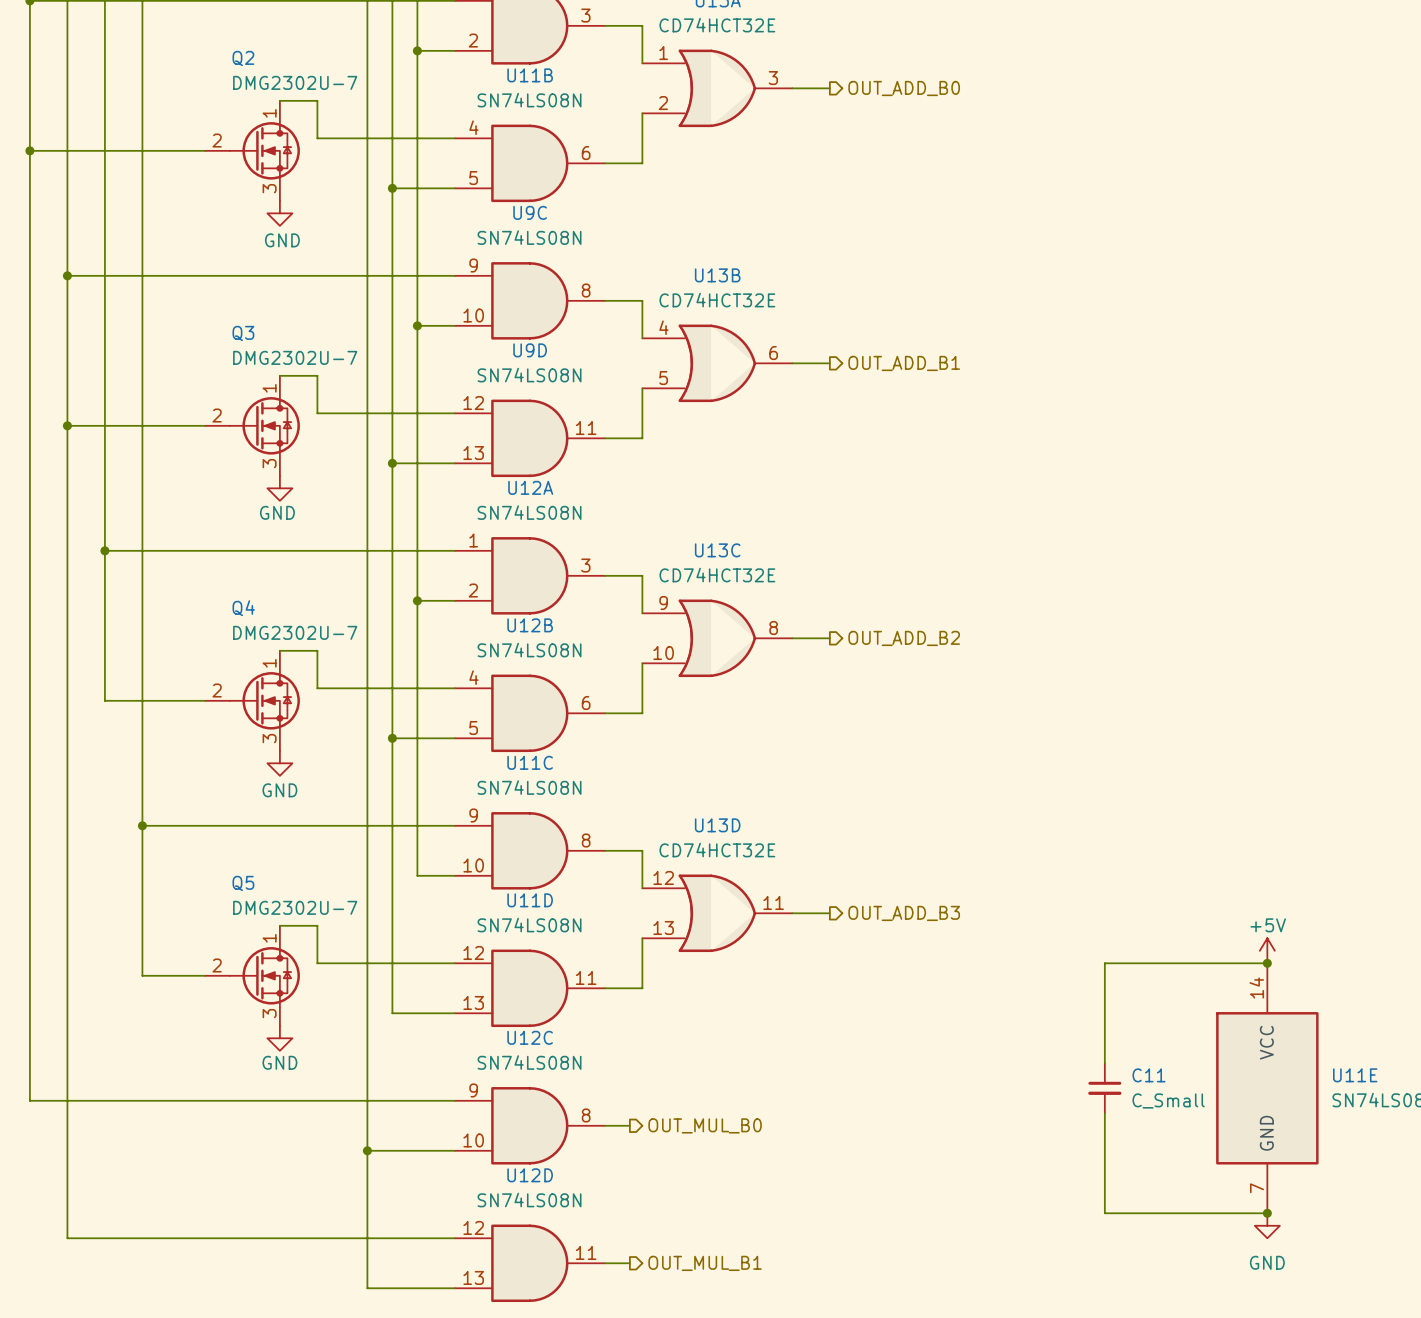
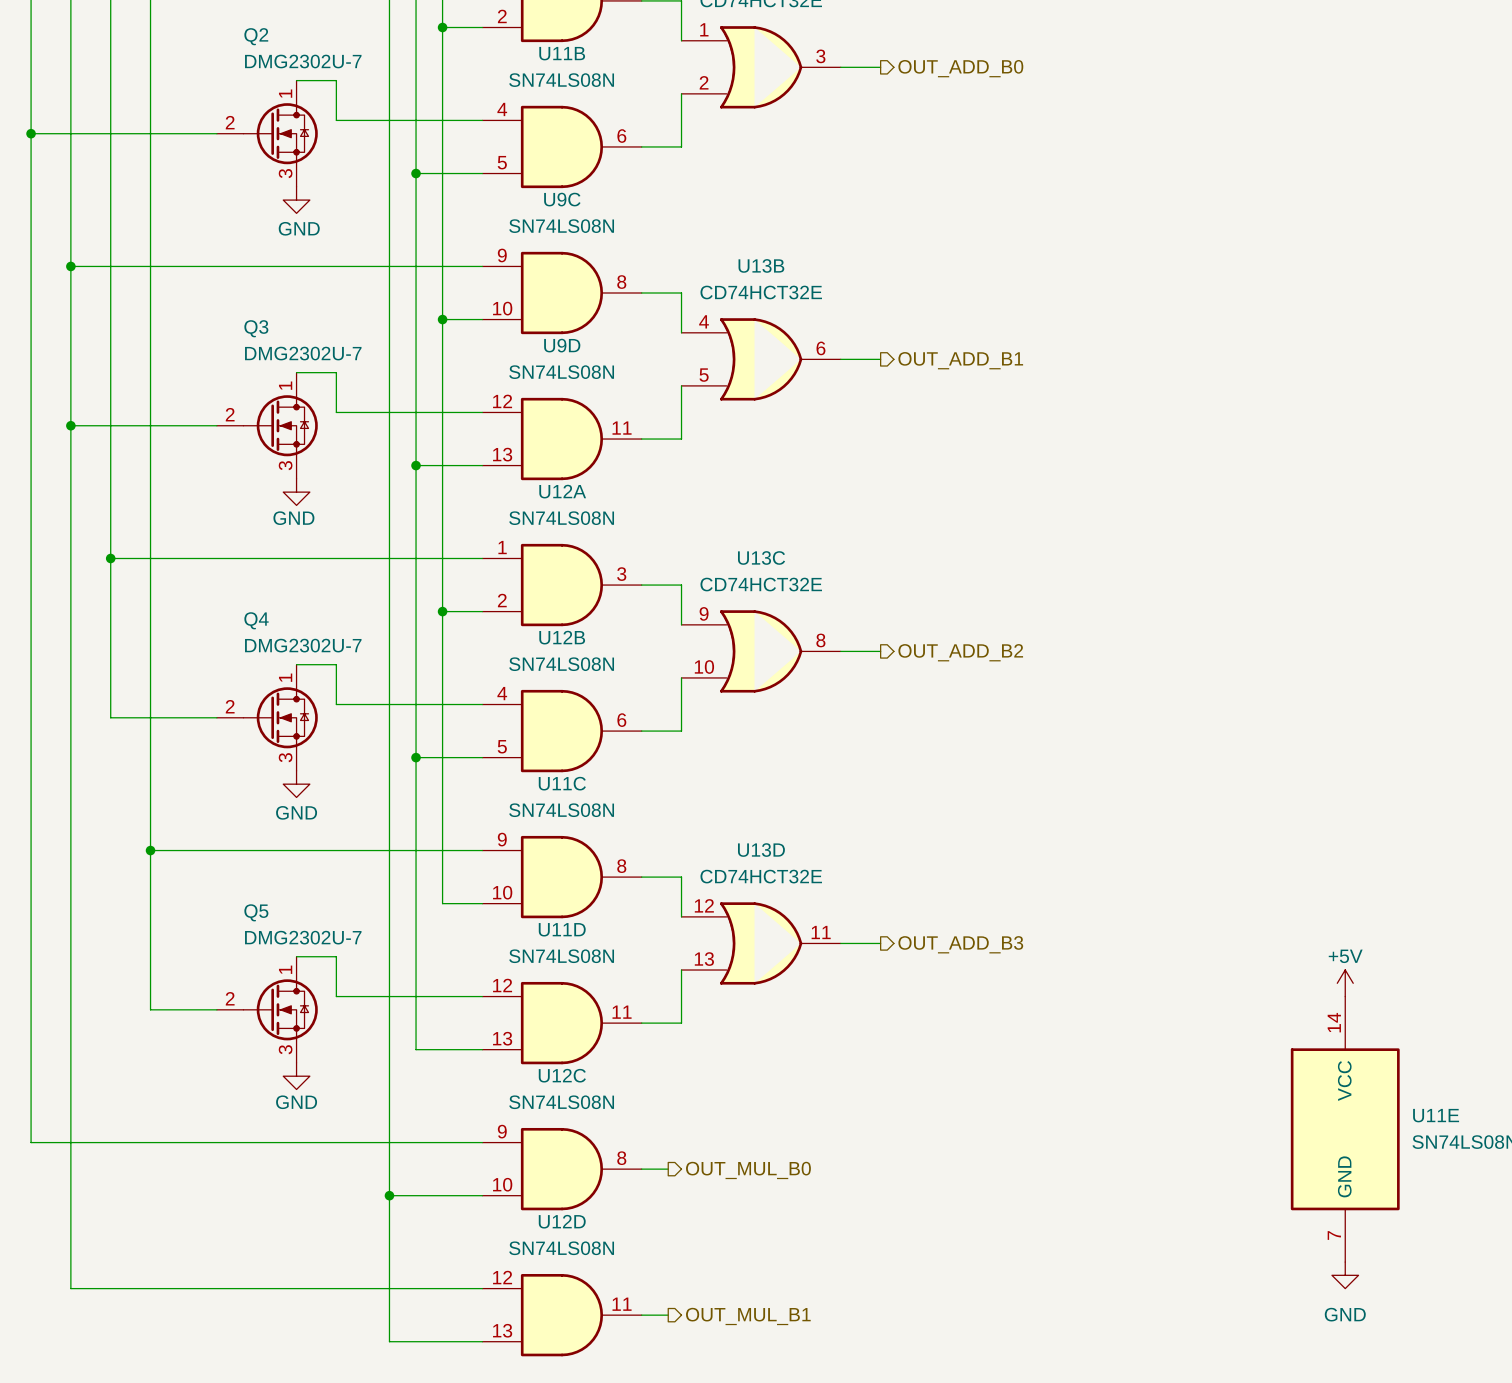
wire: (1267, 963) (1104, 963) (1104, 1063) -> none
junction: (1267, 963) -> none
C11: C_Small (1104, 1088) -> none
wire: (1104, 1113) (1104, 1213) (1267, 1213) -> none
junction: (1267, 1213) -> none

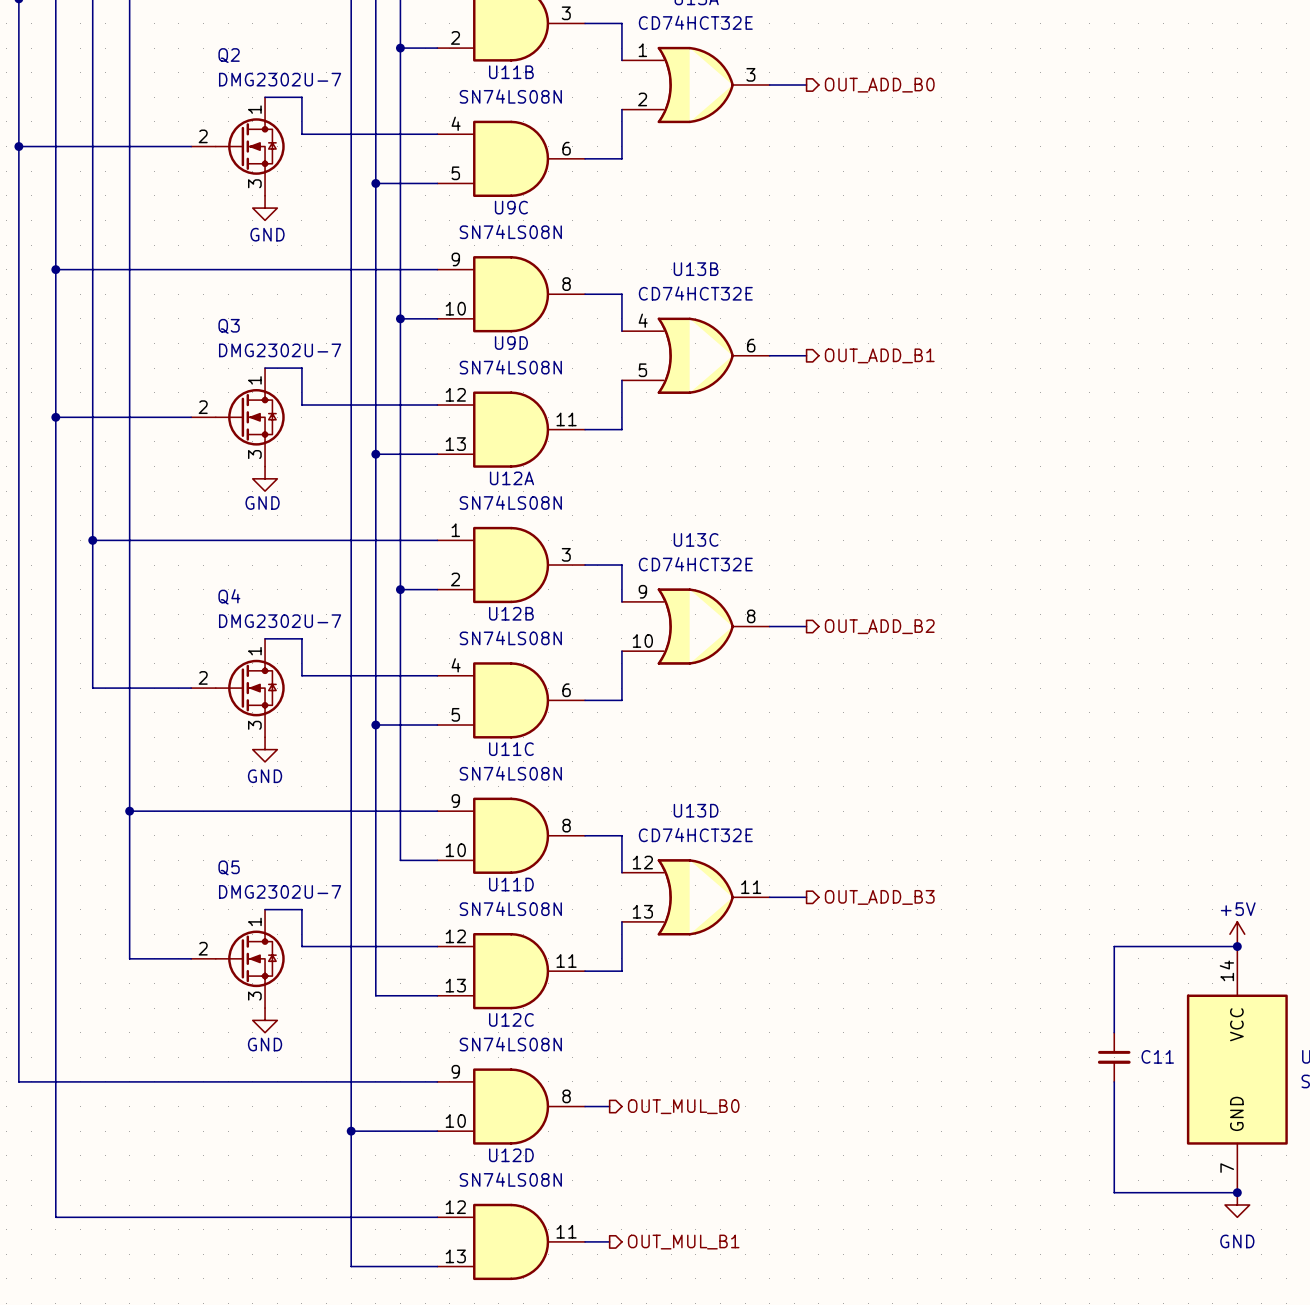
wire: none -> (1237, 946) (1114, 946) (1114, 1032)
junction: none -> (1237, 946)
C11: none -> (1114, 1057)
wire: none -> (1114, 1081) (1114, 1192) (1237, 1192)
junction: none -> (1237, 1192)

